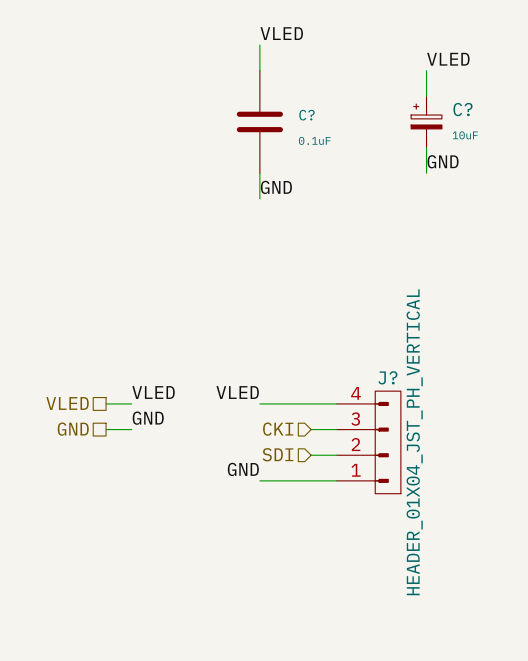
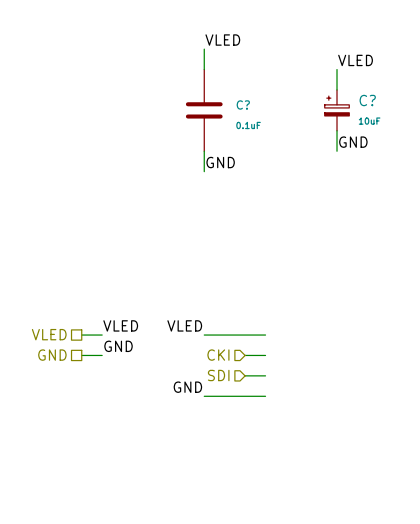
J?: HEADER_01X04_JST_PH_VERTICAL (368, 442) -> none

